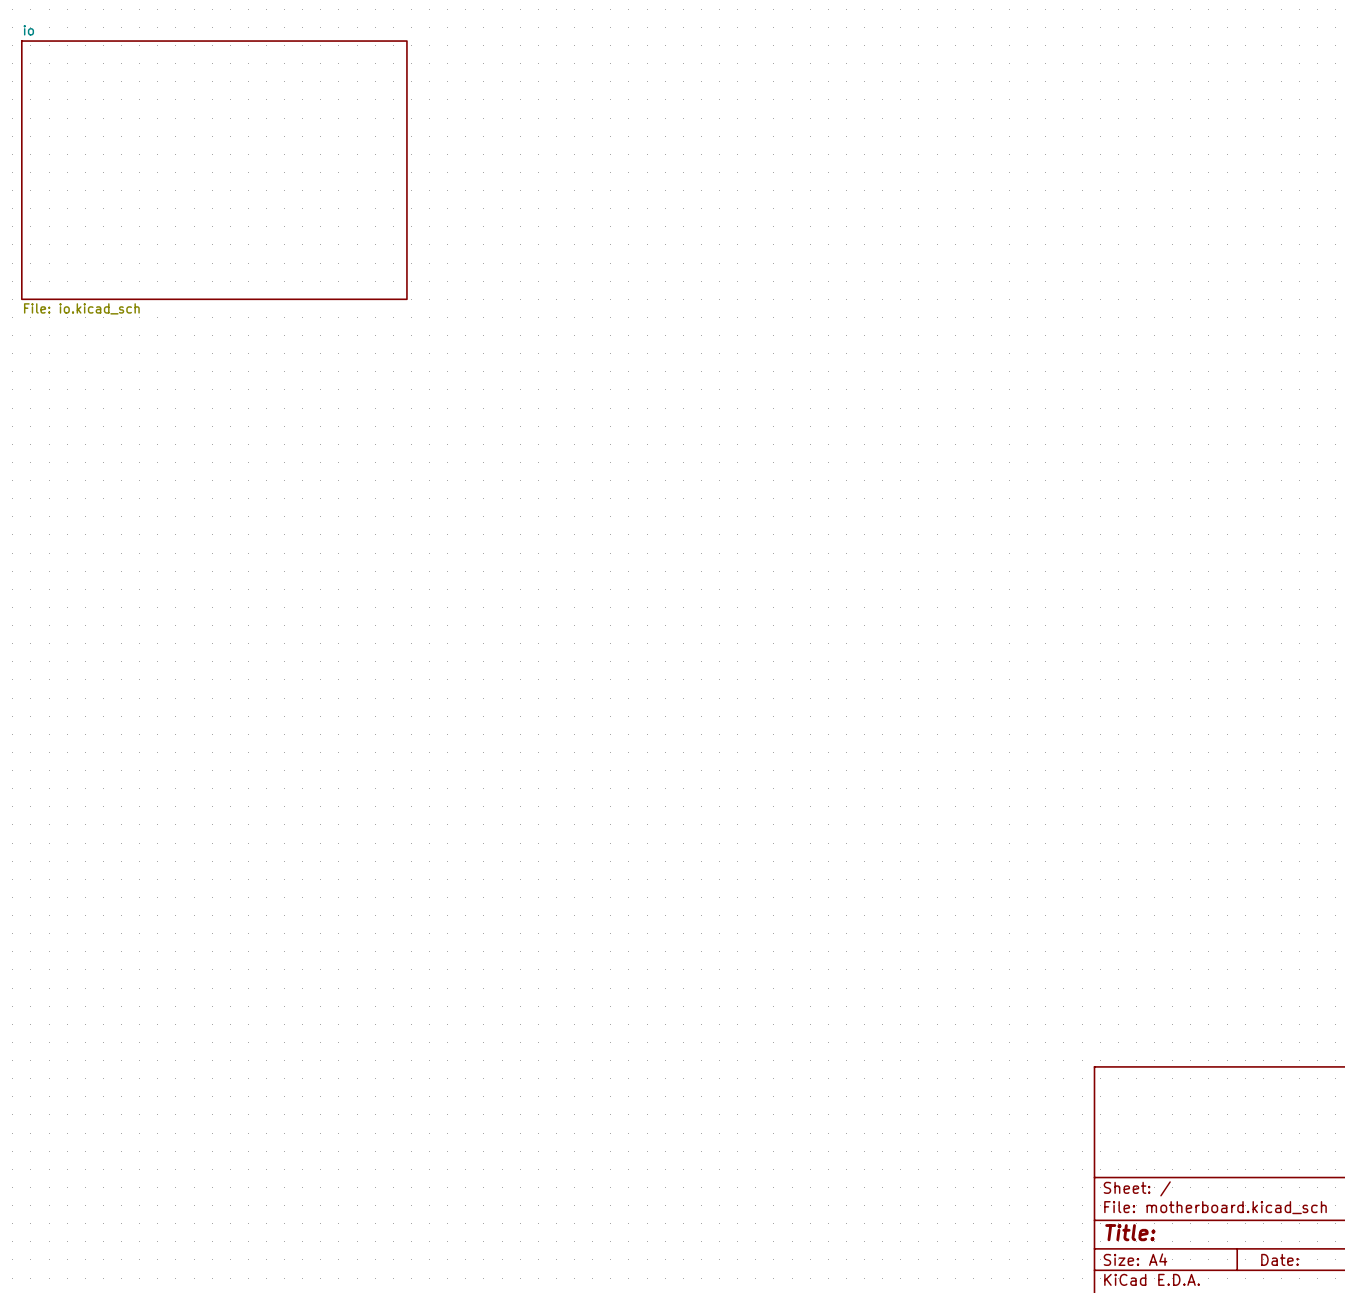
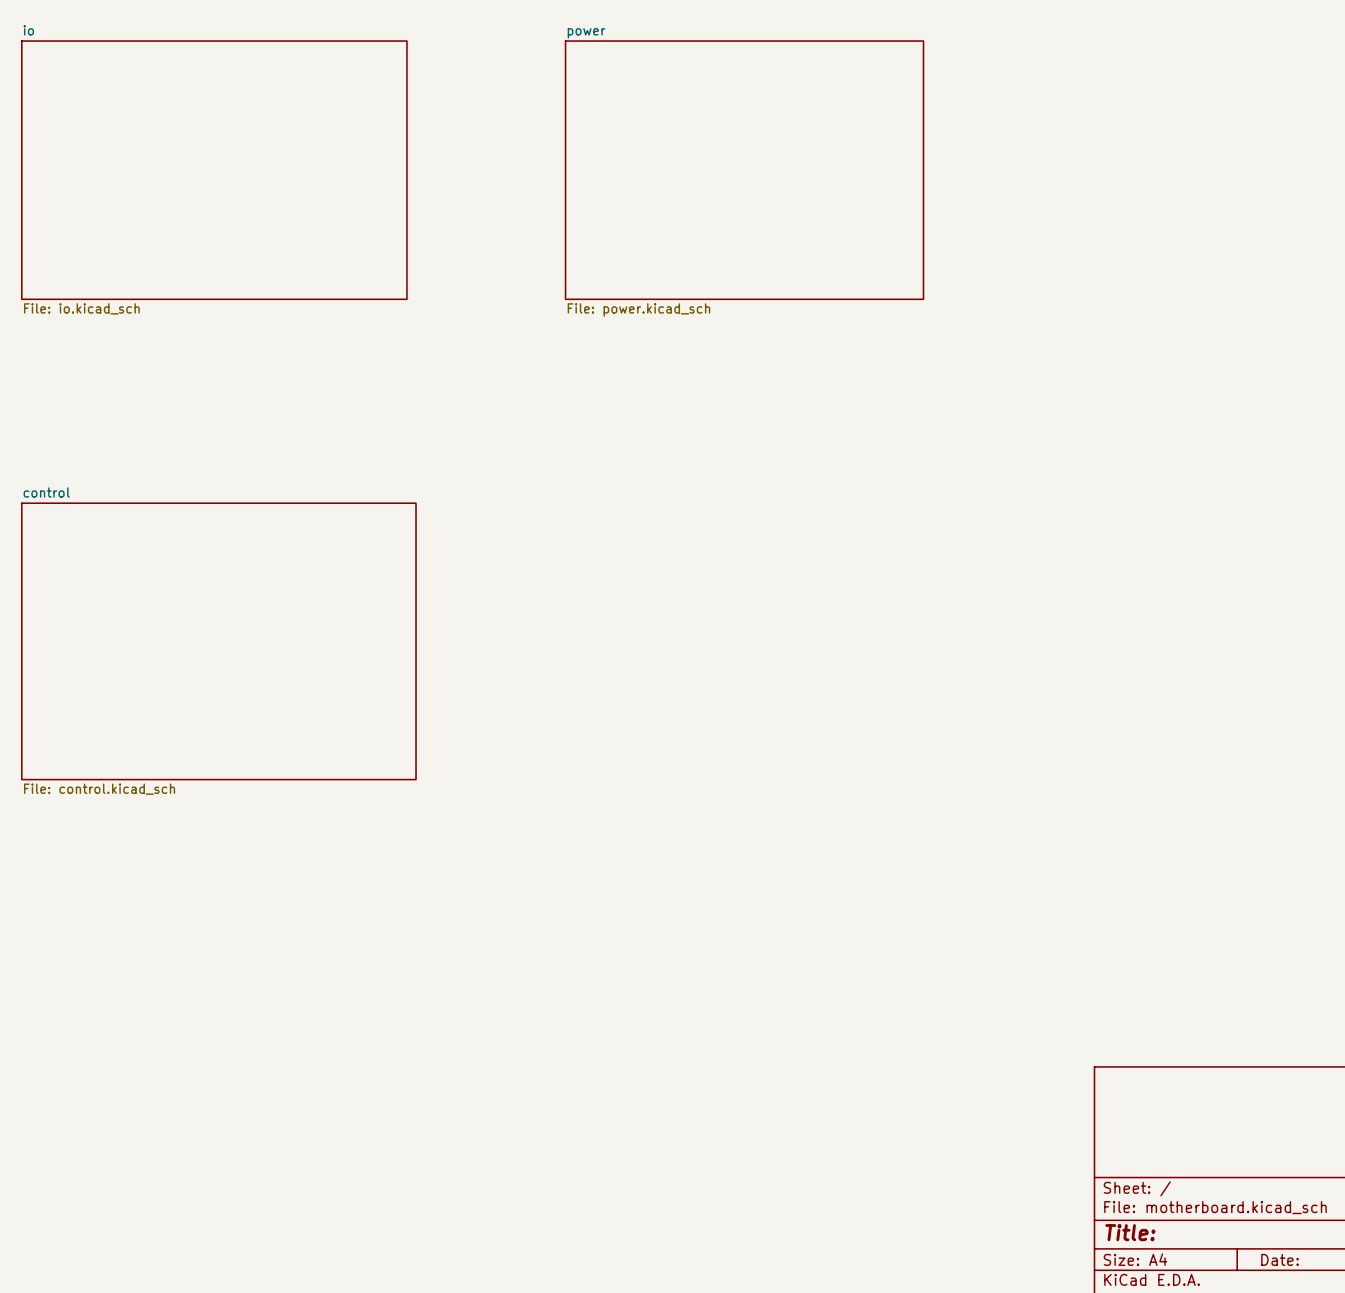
sheet power: none -> File: power.kicad_sch (744, 170)
sheet control: none -> File: control.kicad_sch (218, 641)

